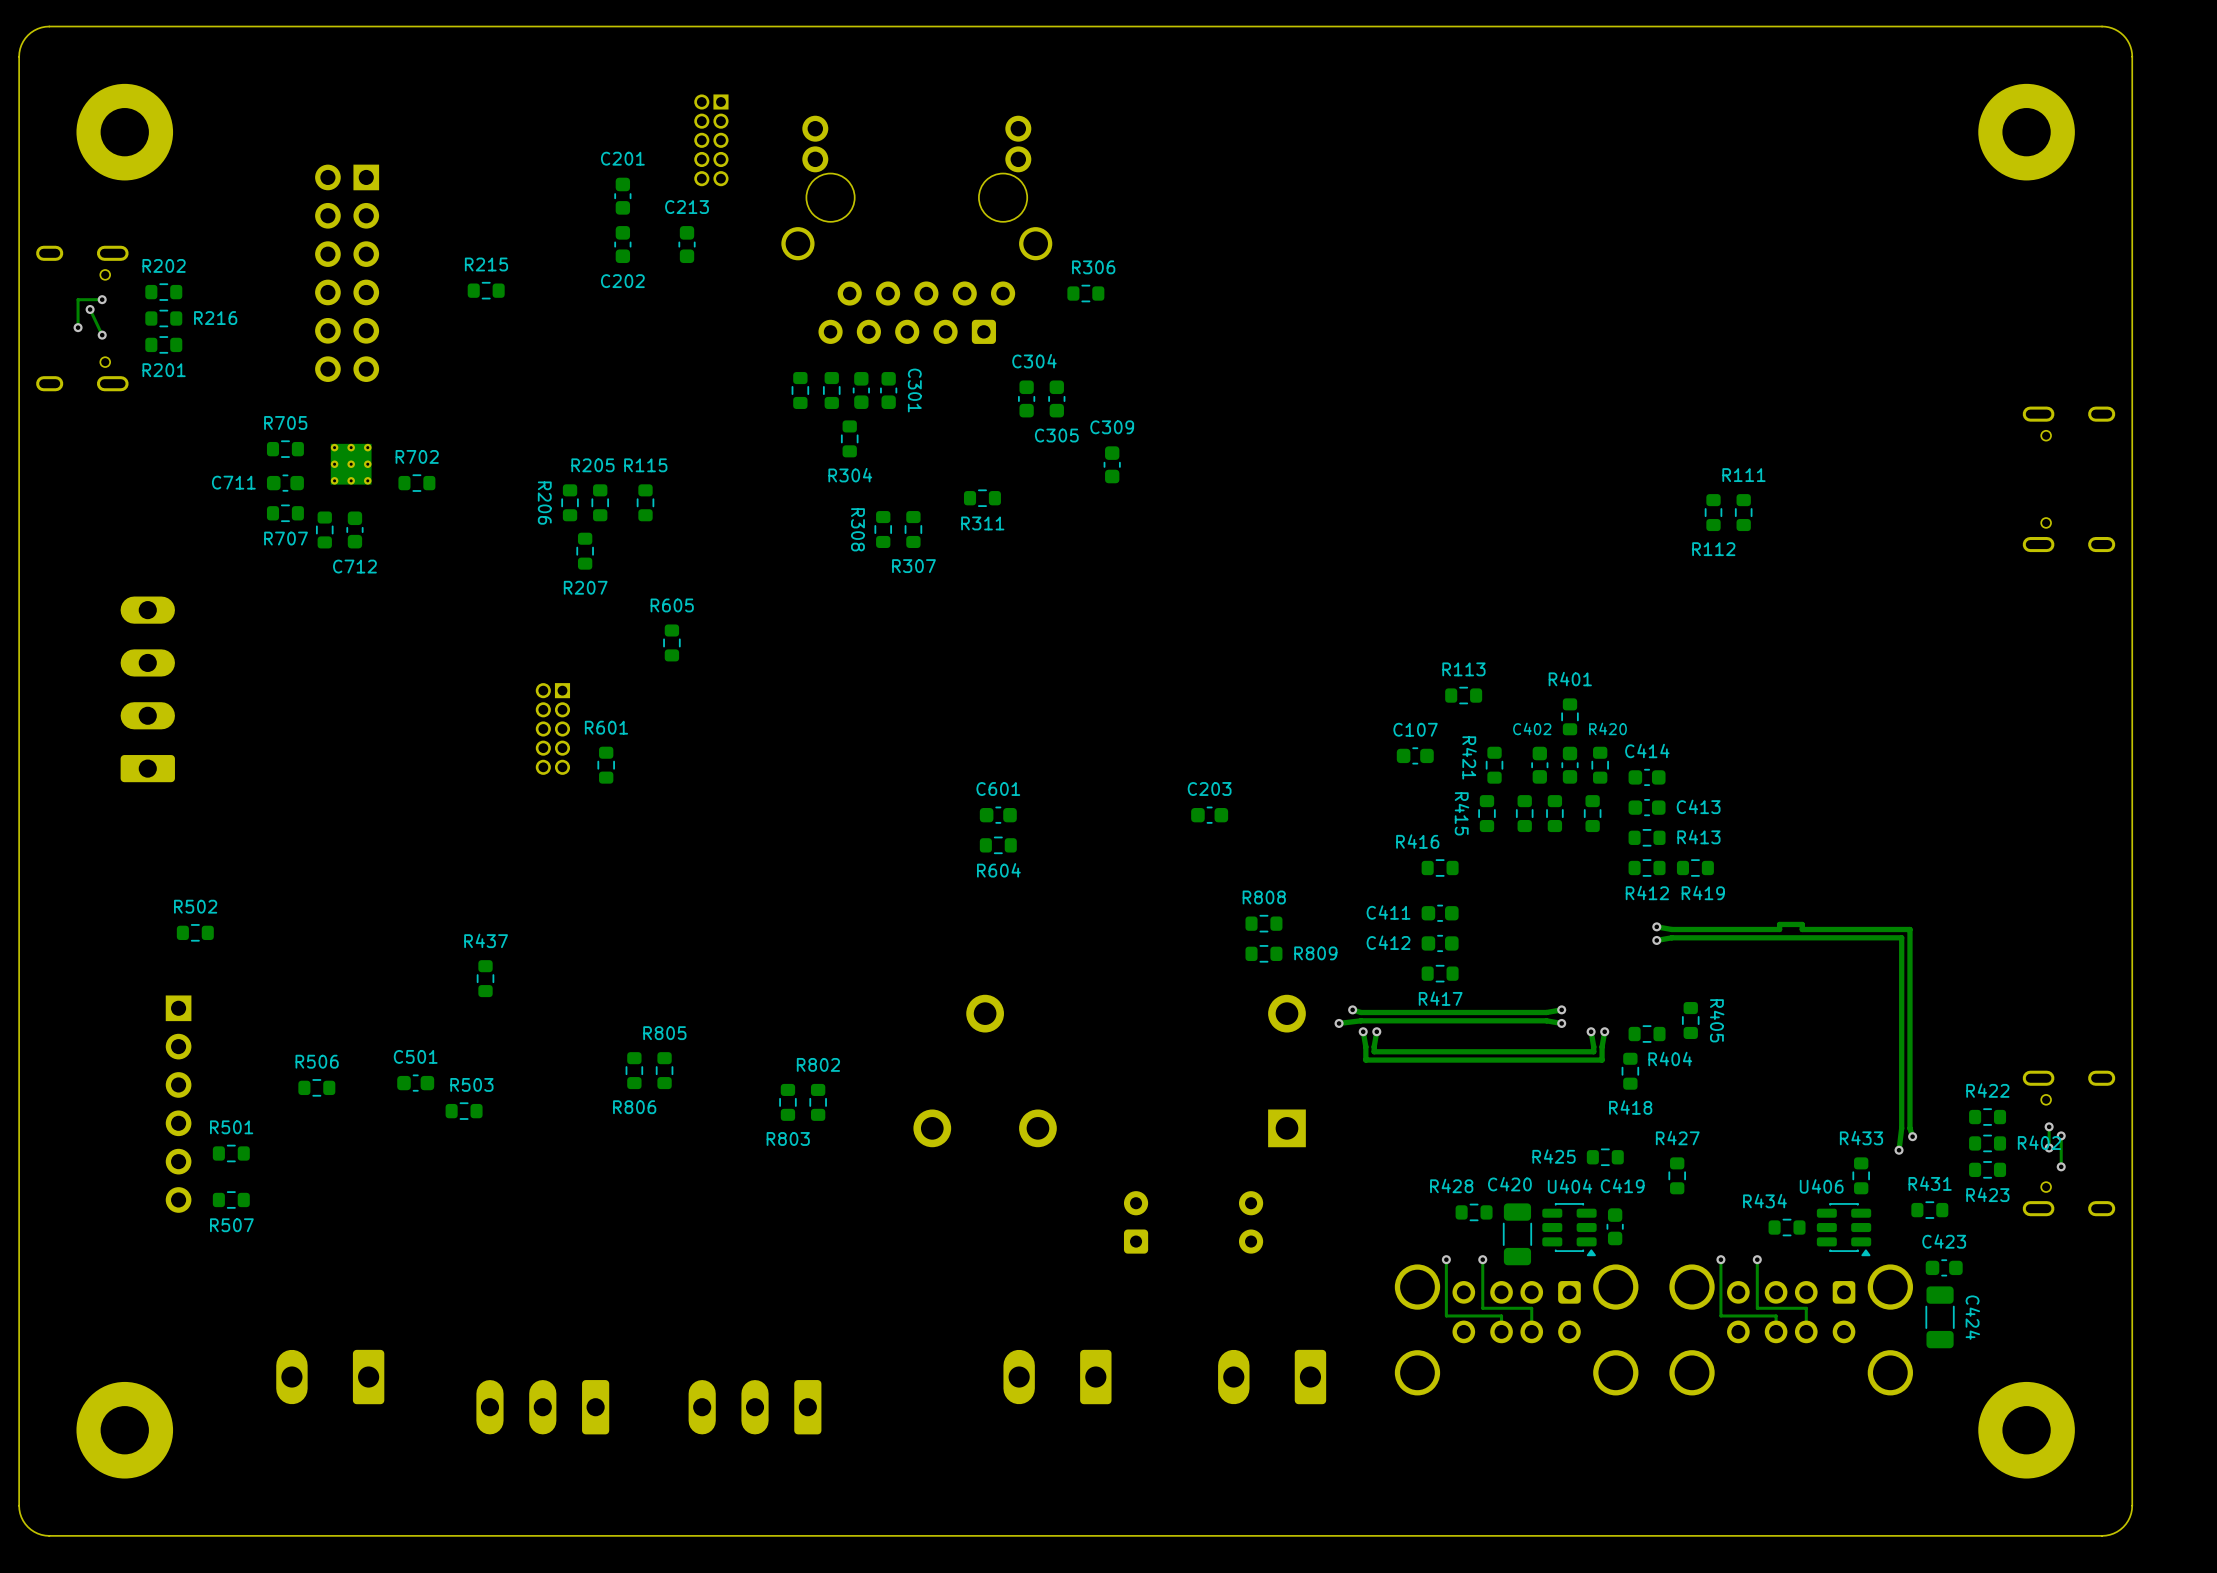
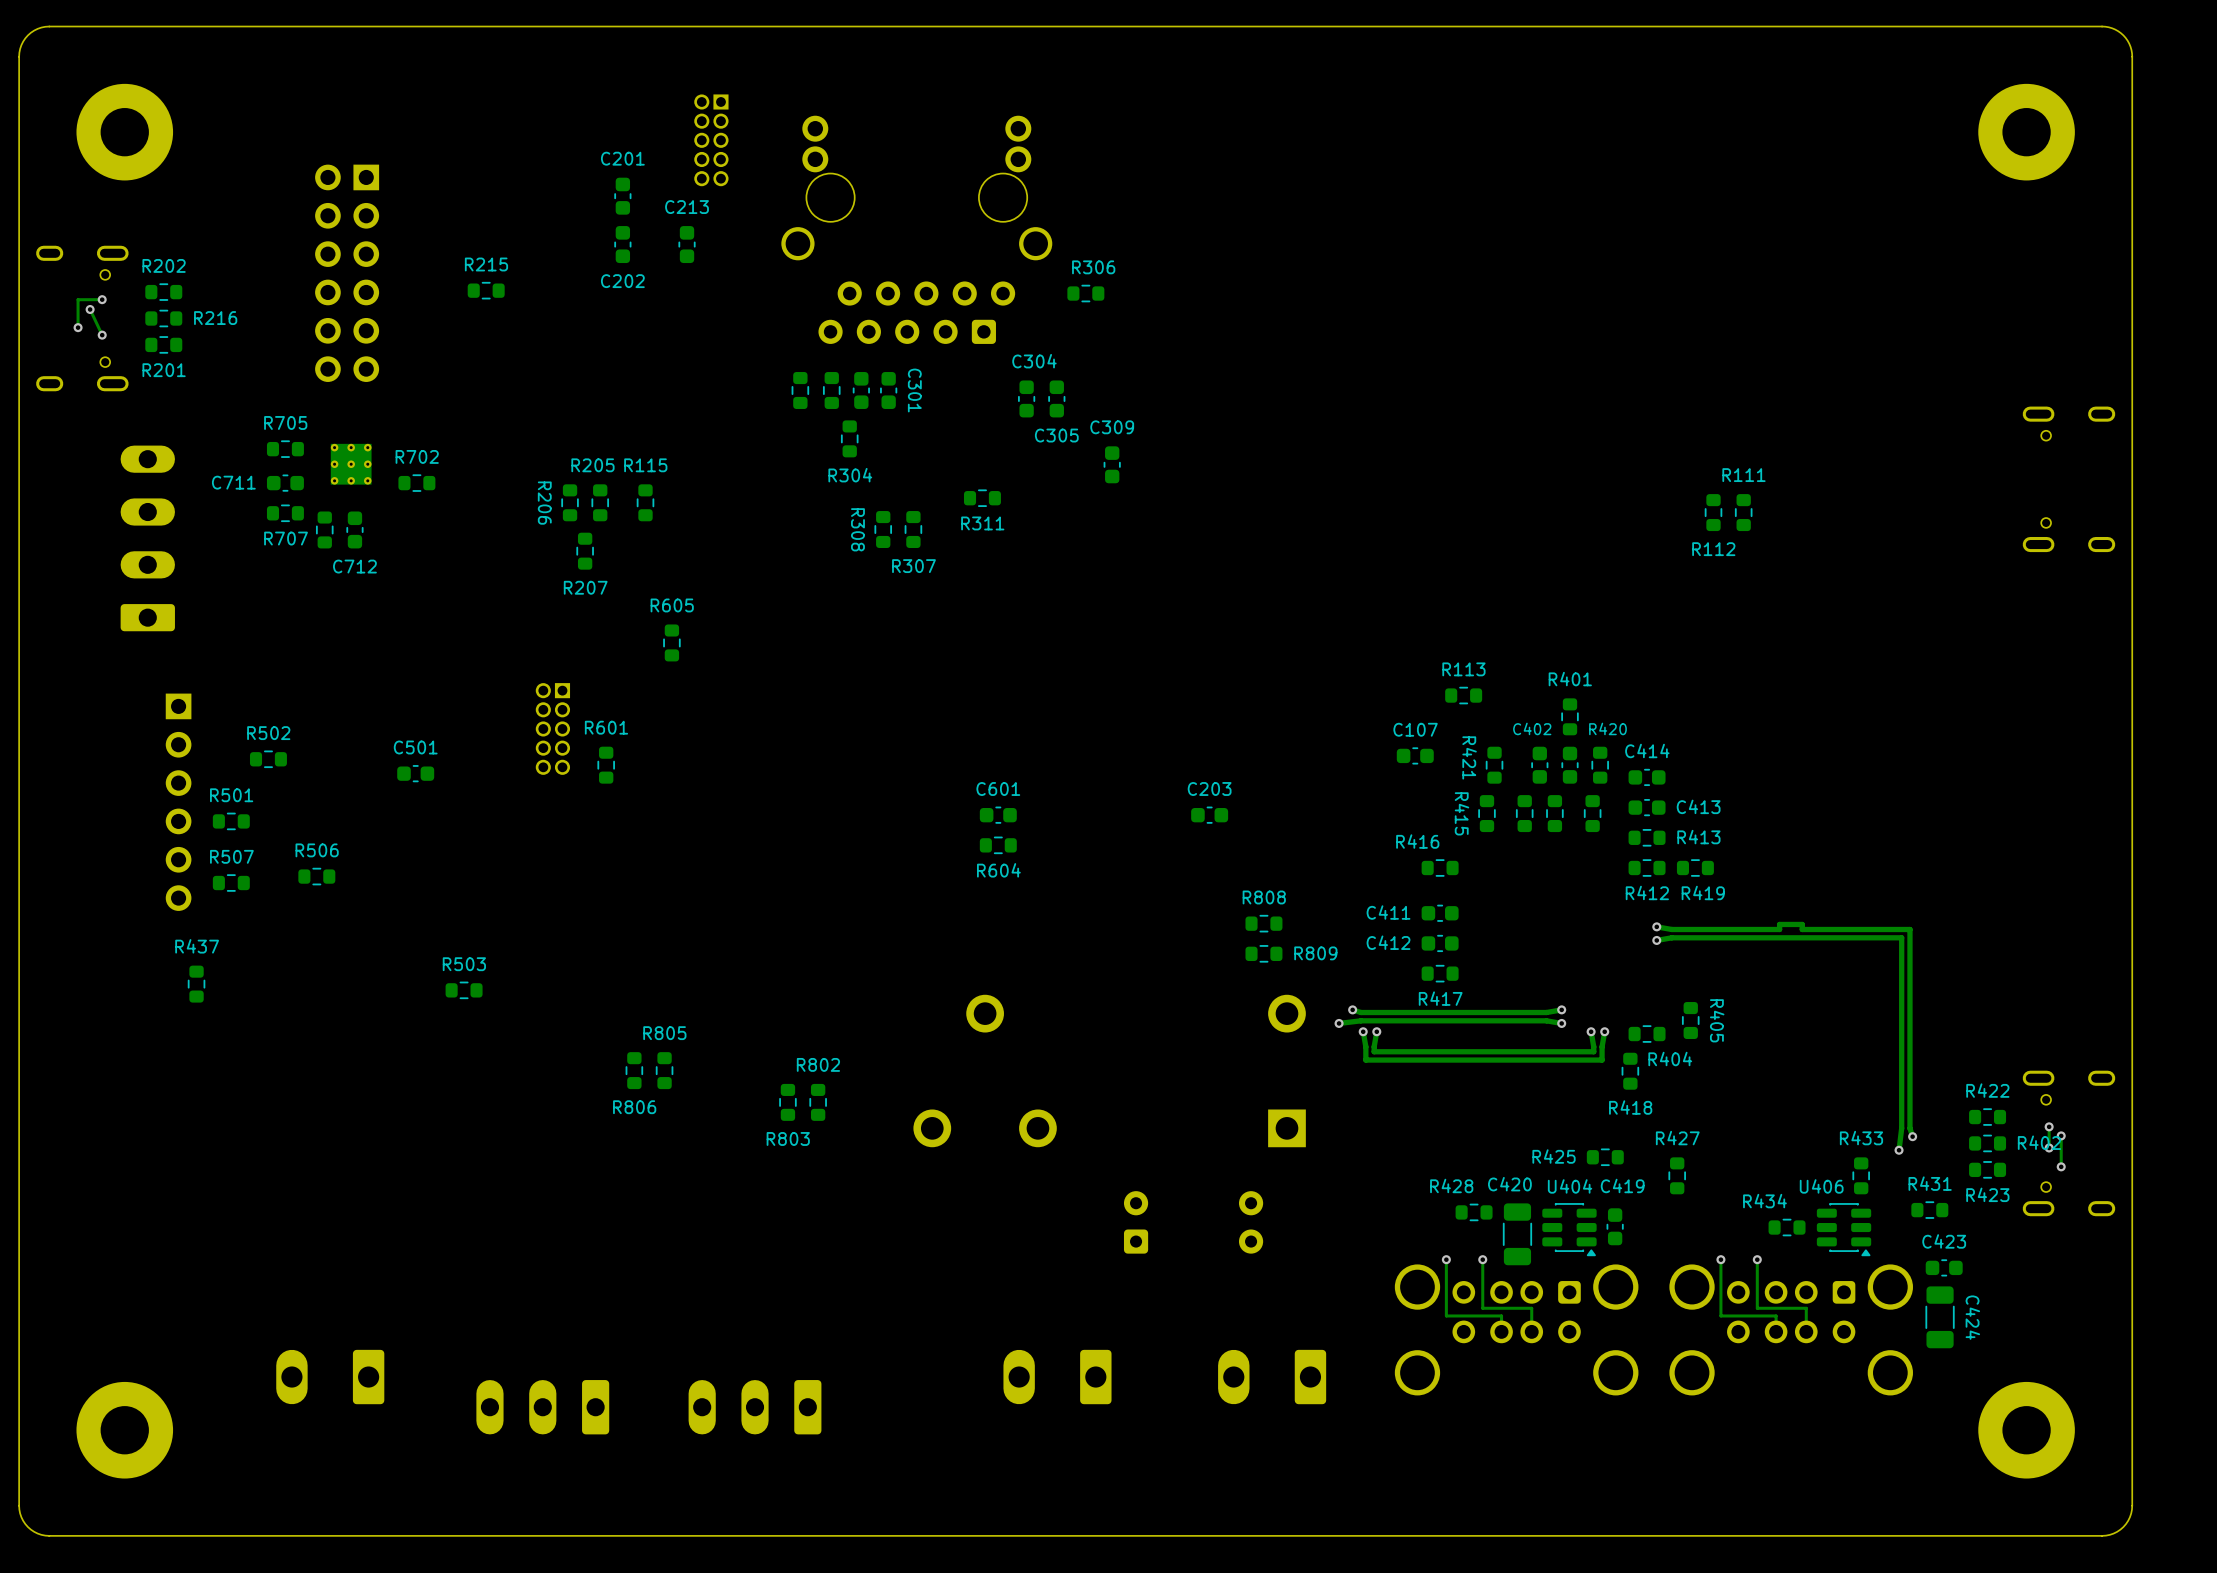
part position: (147, 689) -> (147, 538)
R502 position: (195, 932) -> (268, 759)
R437 position: (485, 978) -> (196, 984)
C501 position: (415, 1083) -> (415, 773)
R503 name position: R503 (471, 1084) -> R503 (464, 964)
R506 position: (316, 1087) -> (316, 876)
part position: (178, 1104) -> (178, 802)
R503 position: (464, 1111) -> (464, 990)
R501 position: (231, 1153) -> (231, 821)
R507 position: (231, 1199) -> (231, 883)
R507 name position: R507 (231, 1225) -> R507 (231, 856)

